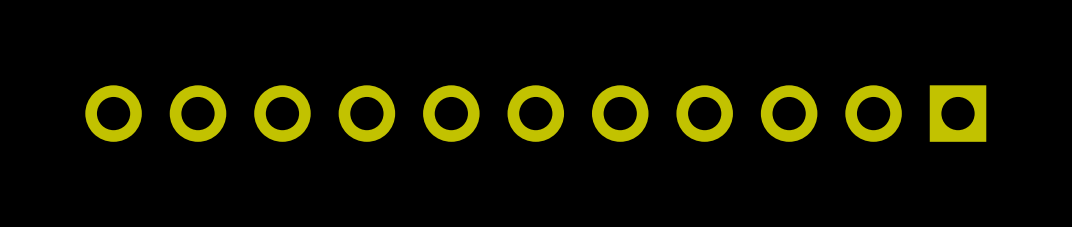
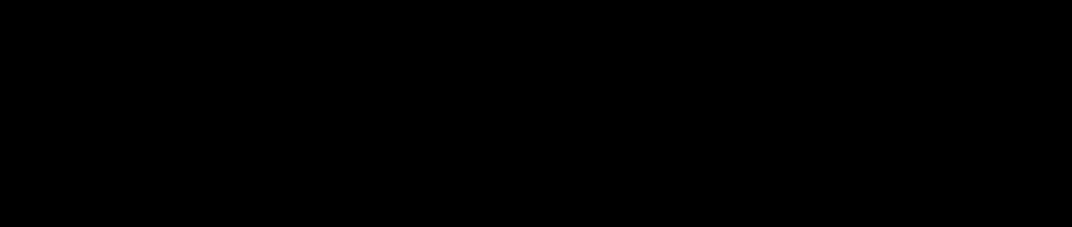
part: (535, 113) -> none

